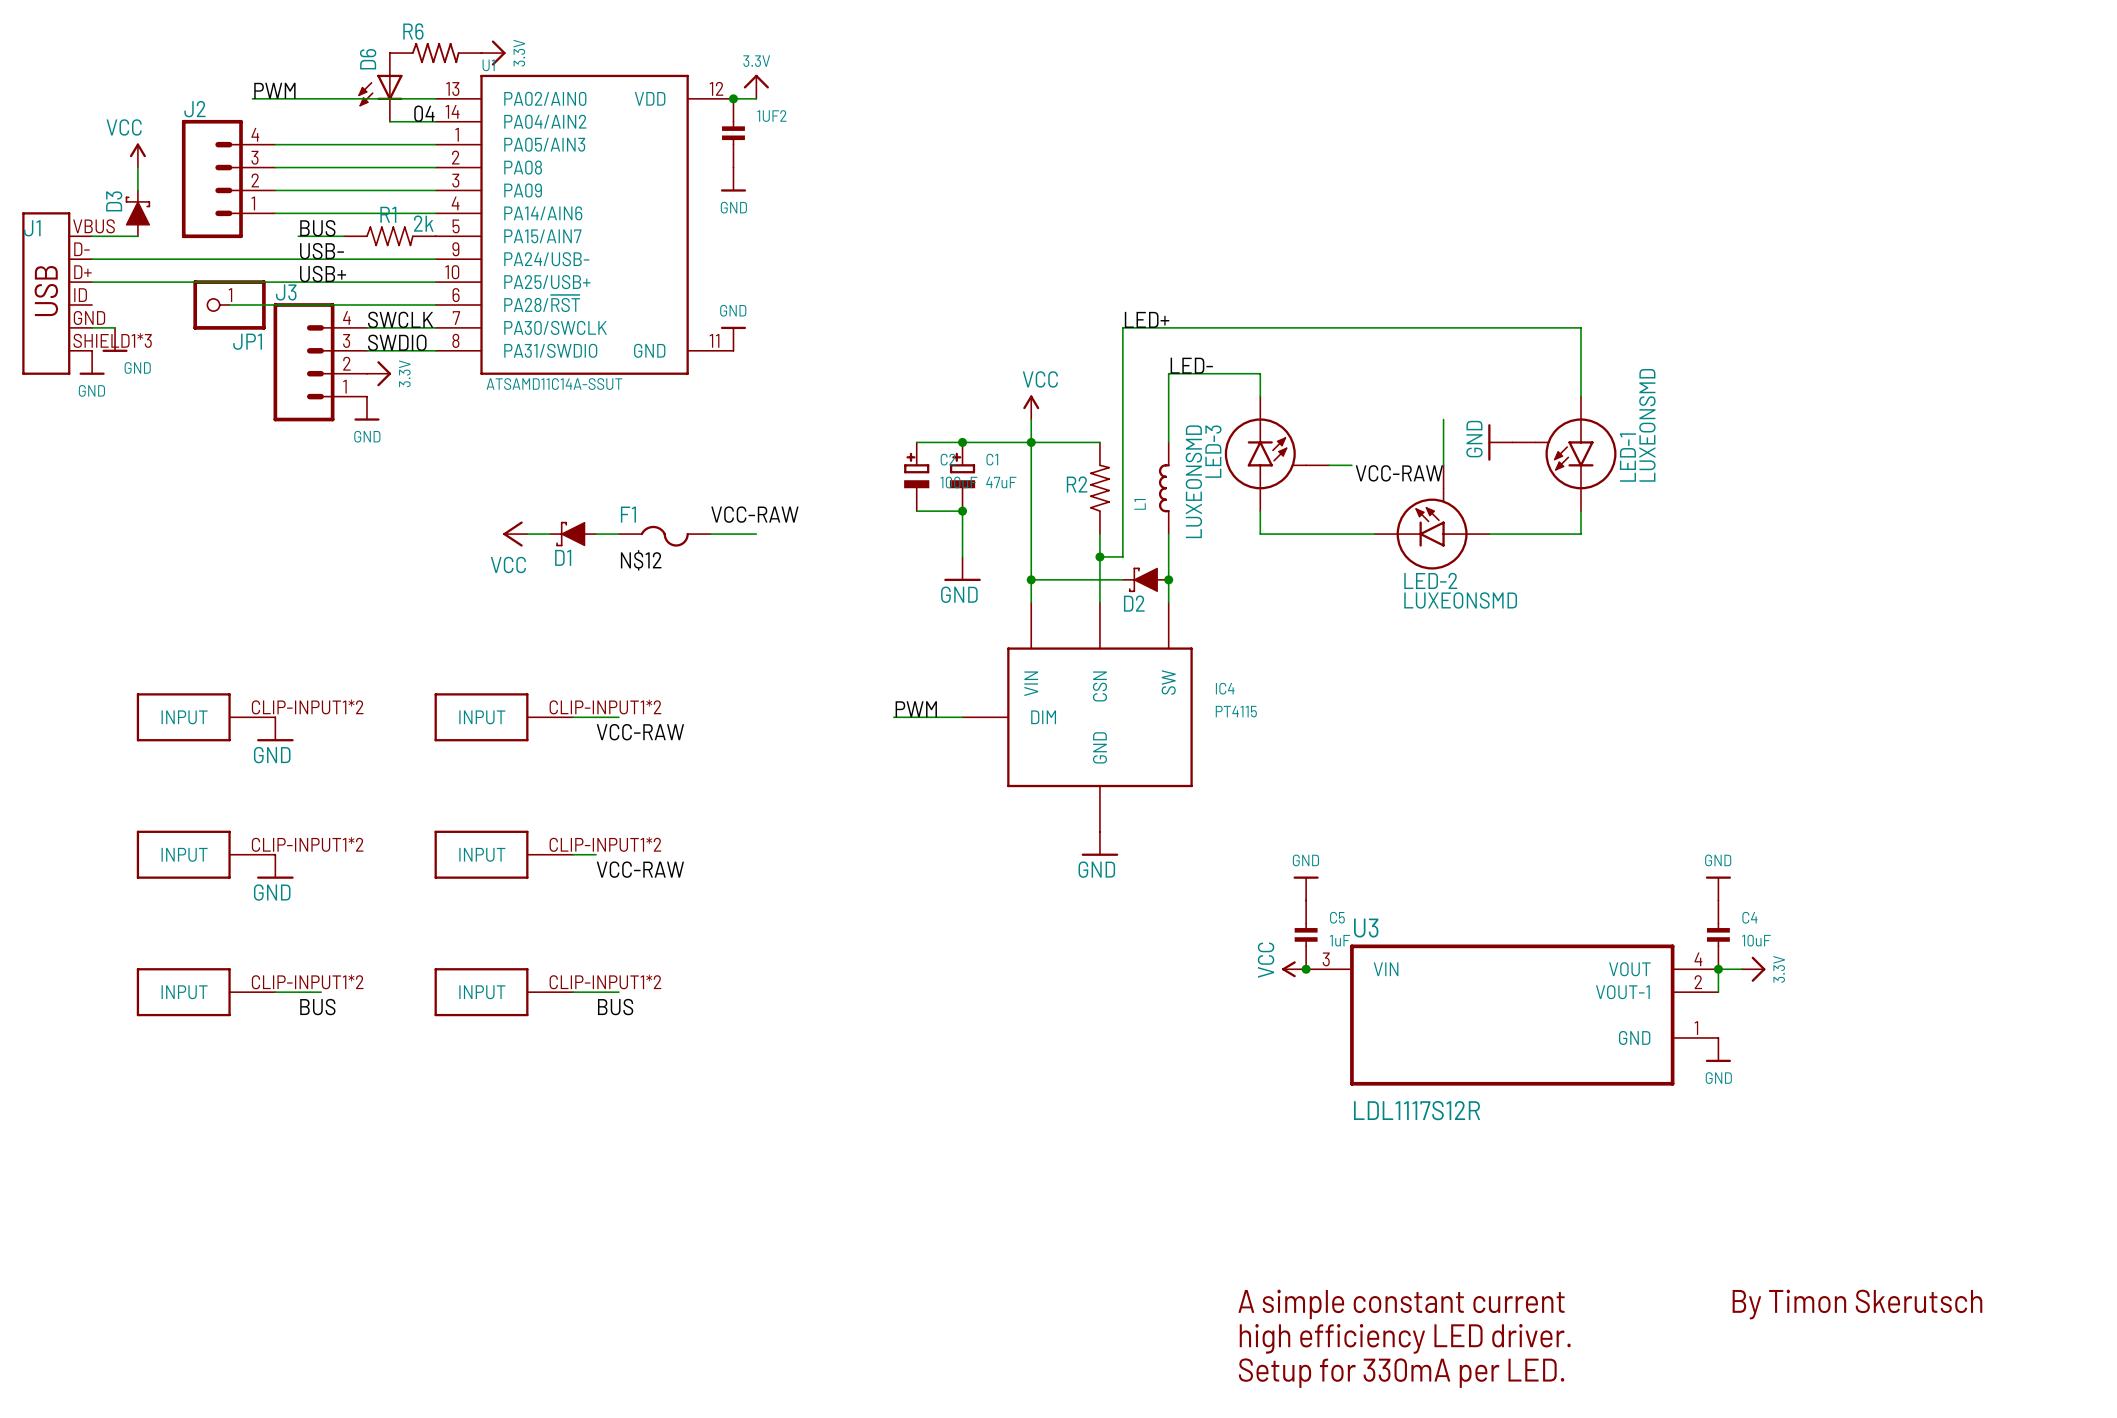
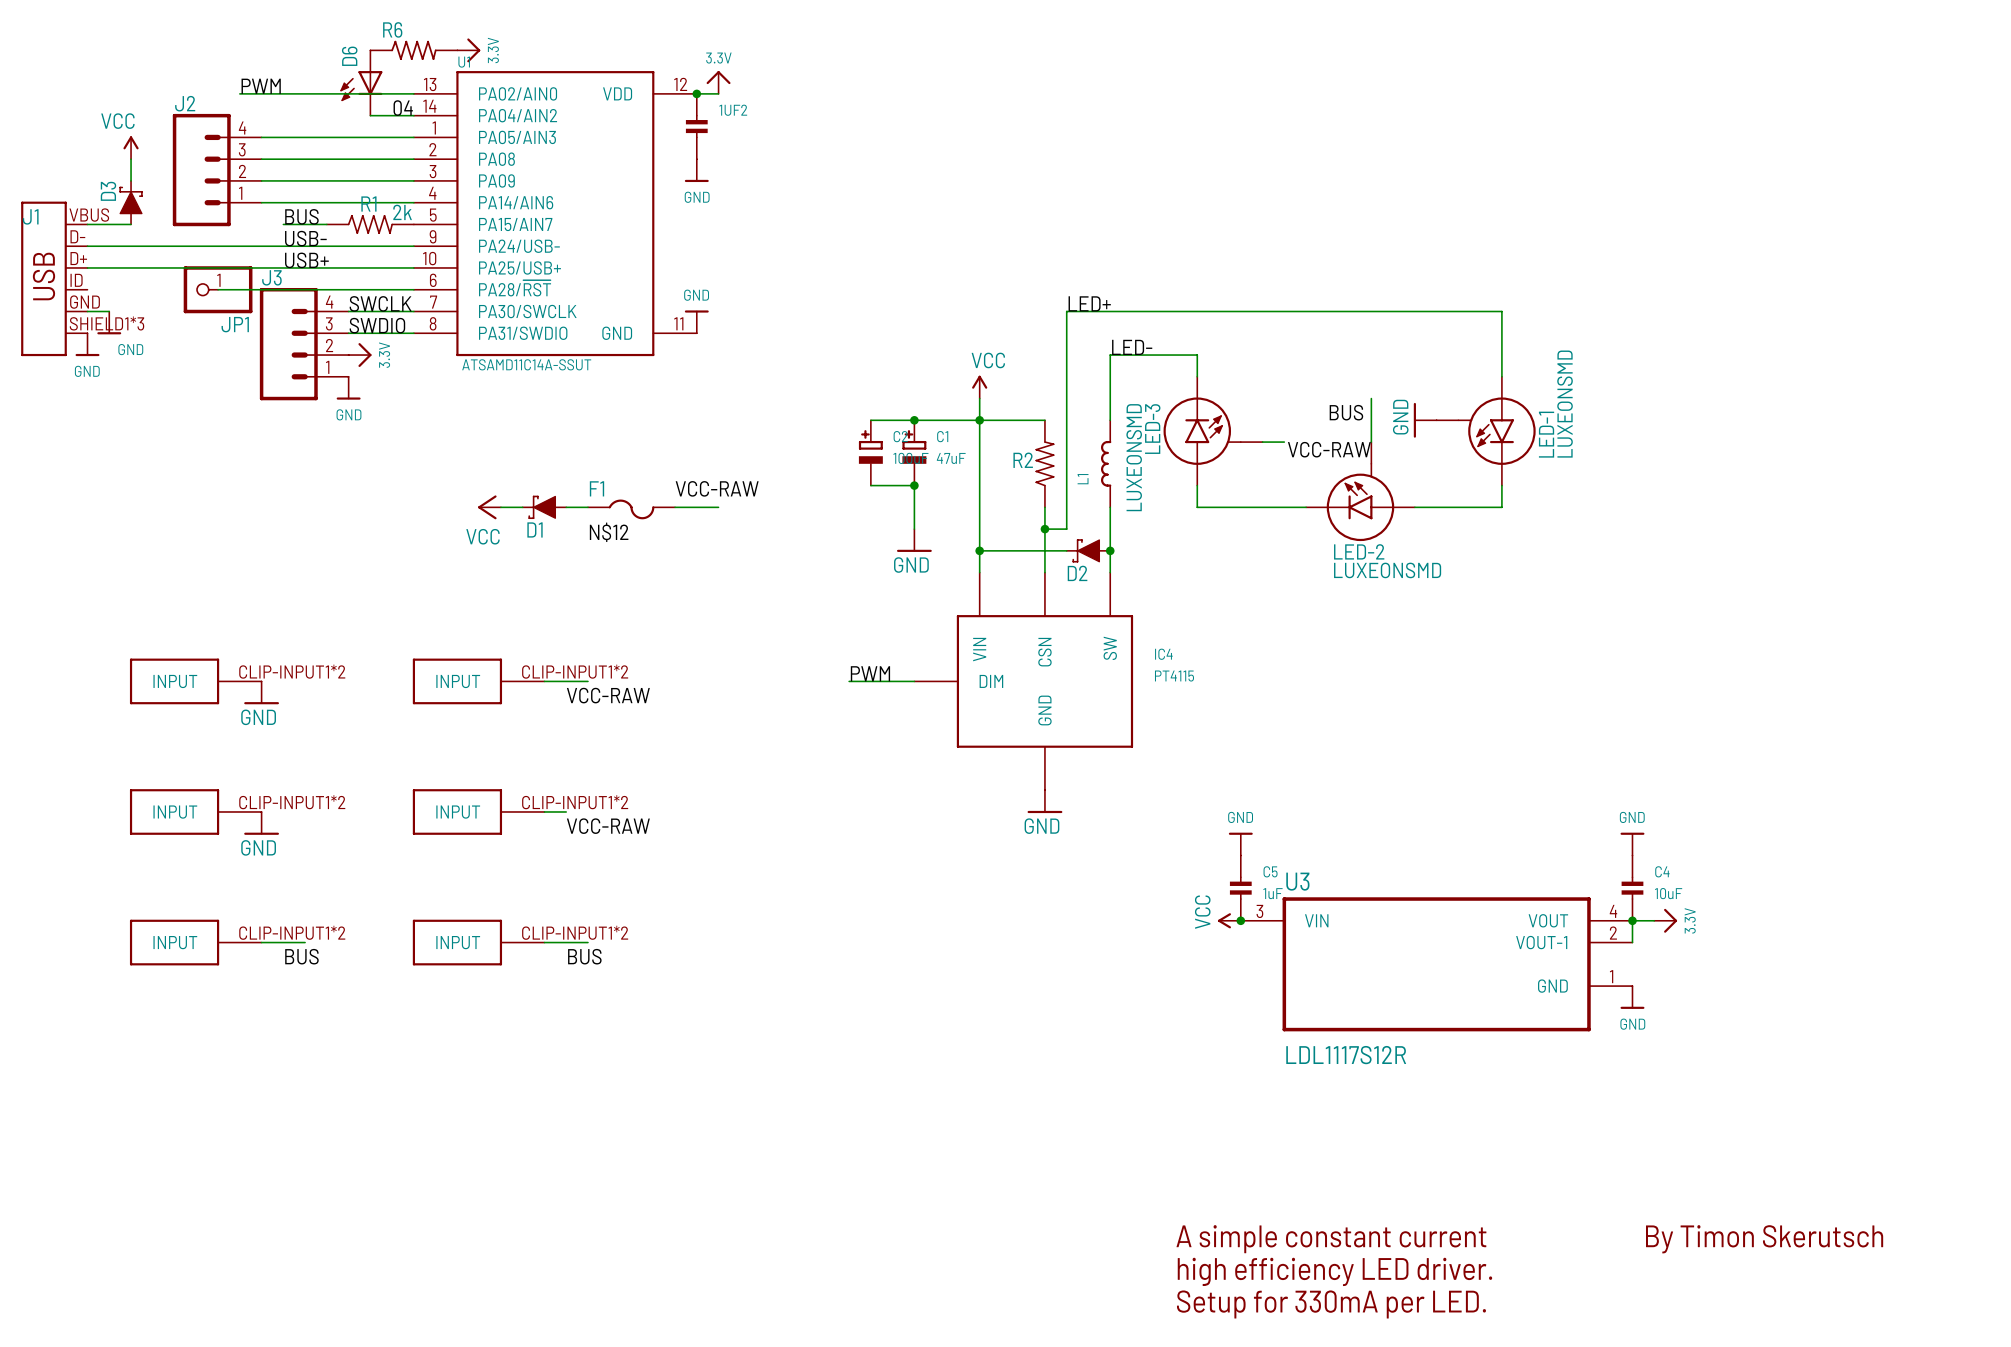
label: none -> BUS (1346, 412)

